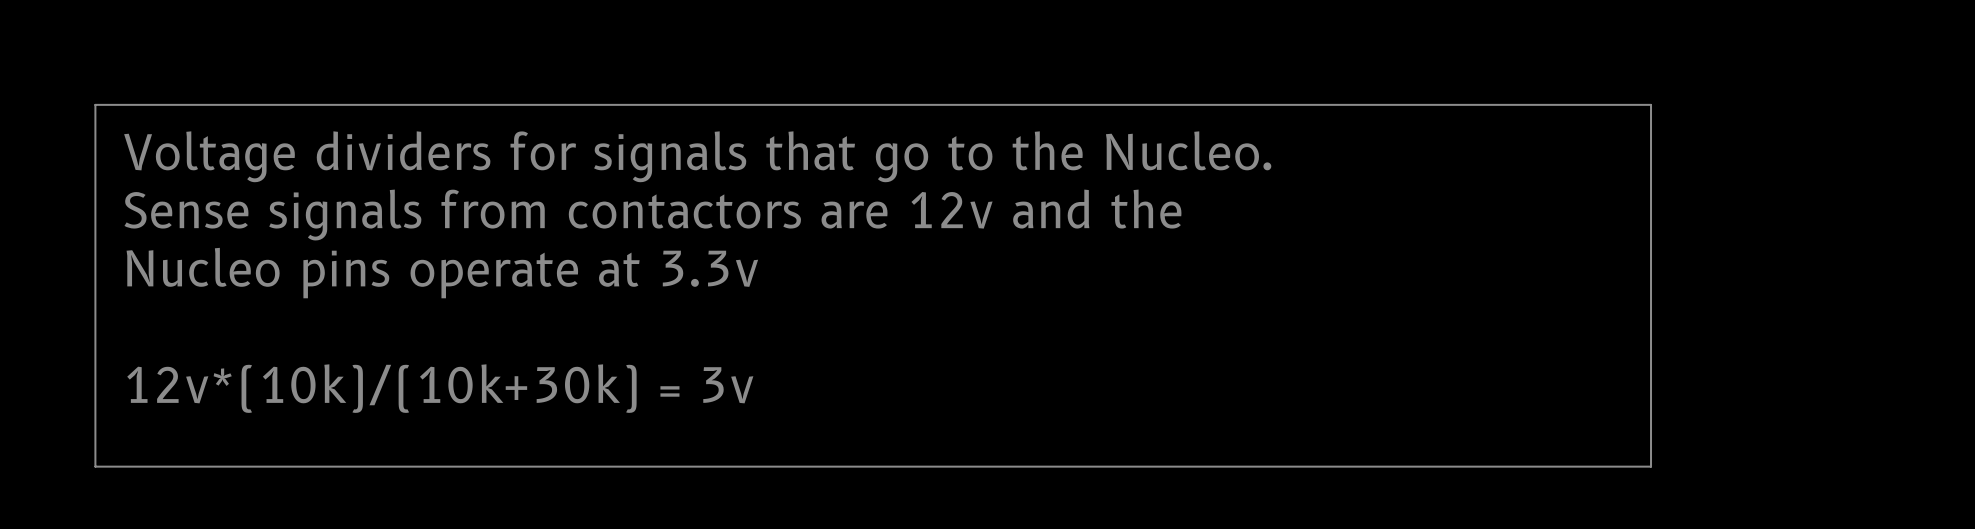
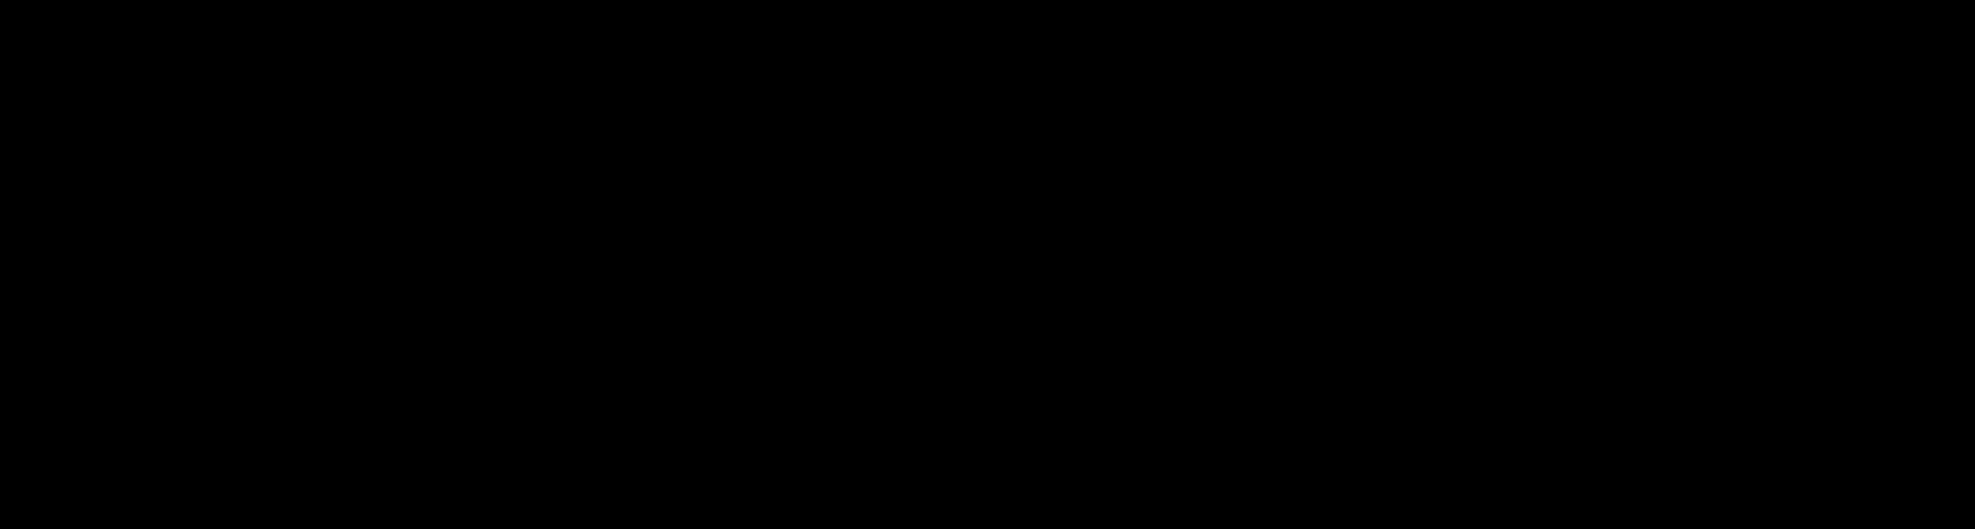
line: (95, 104) (1651, 104) (1651, 466) (95, 466) (95, 104) -> none
text: Voltage dividers for signals that go to the Nucleo. (697, 156) -> none
text: Sense signals from contactors are 12v and the (652, 215) -> none
text: Nucleo pins operate at 3.3v (442, 273) -> none
text: 12v*(10k)/(10k+30k) = 3v (440, 388) -> none

